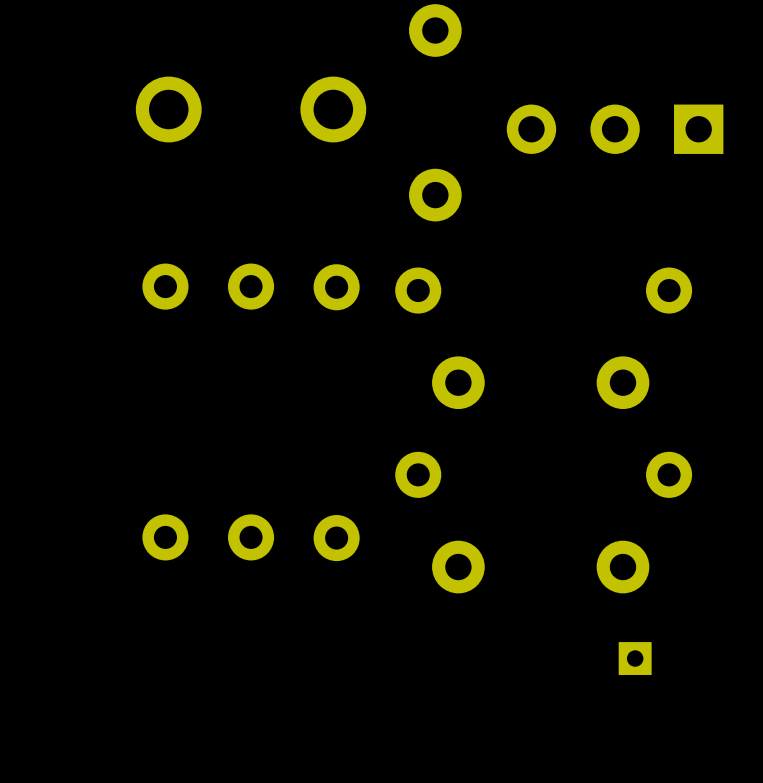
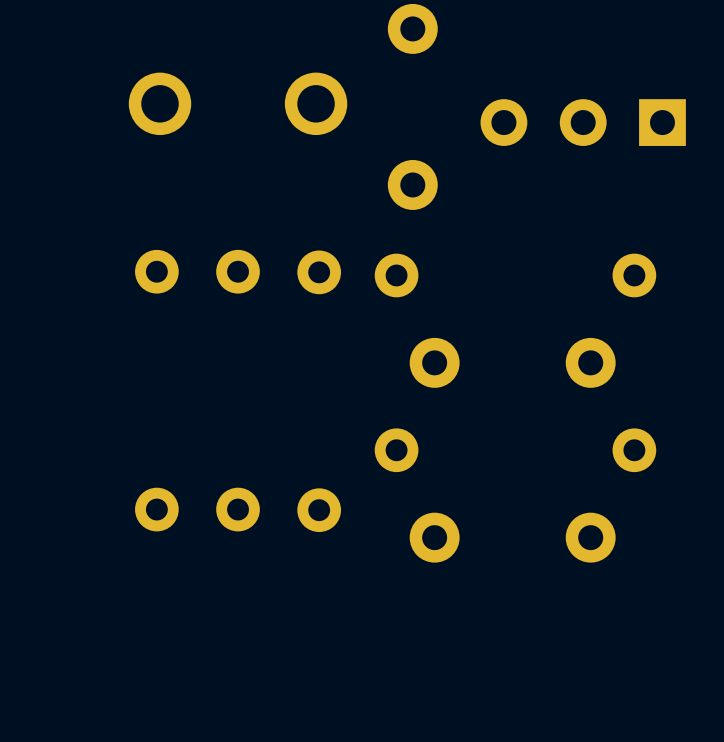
part: (635, 658) -> none

